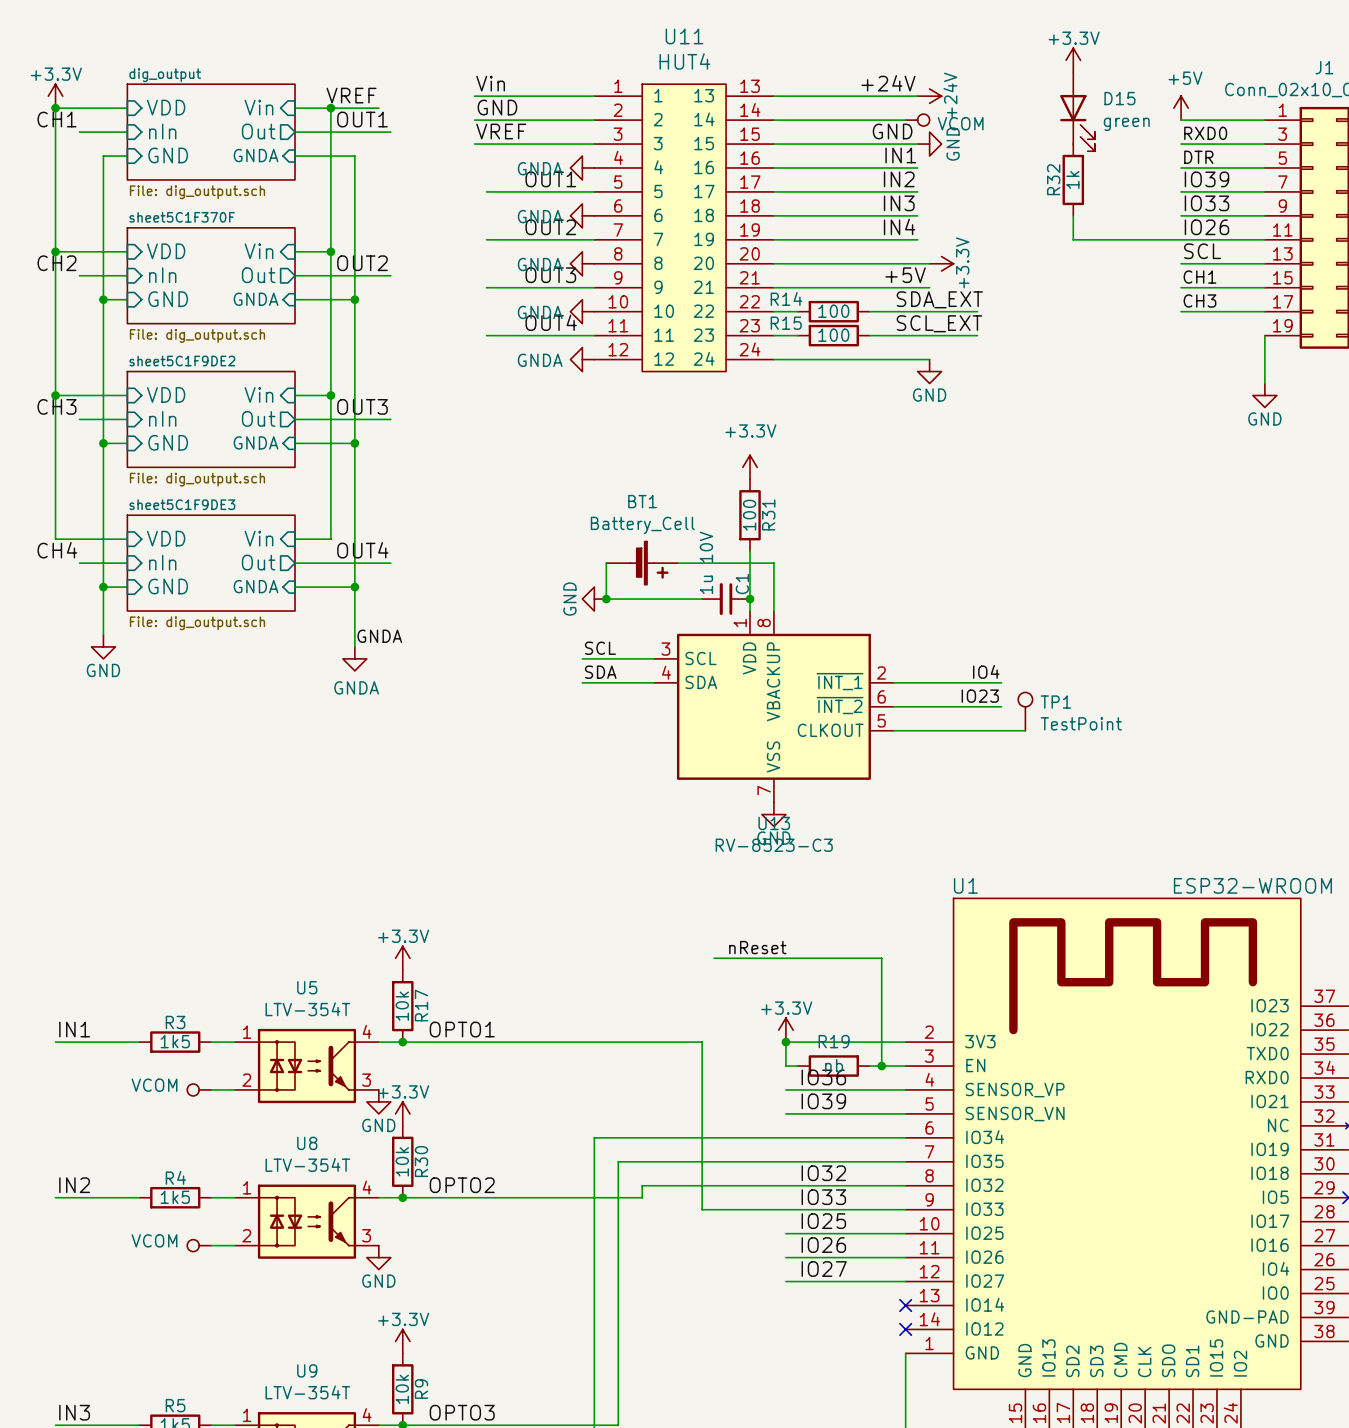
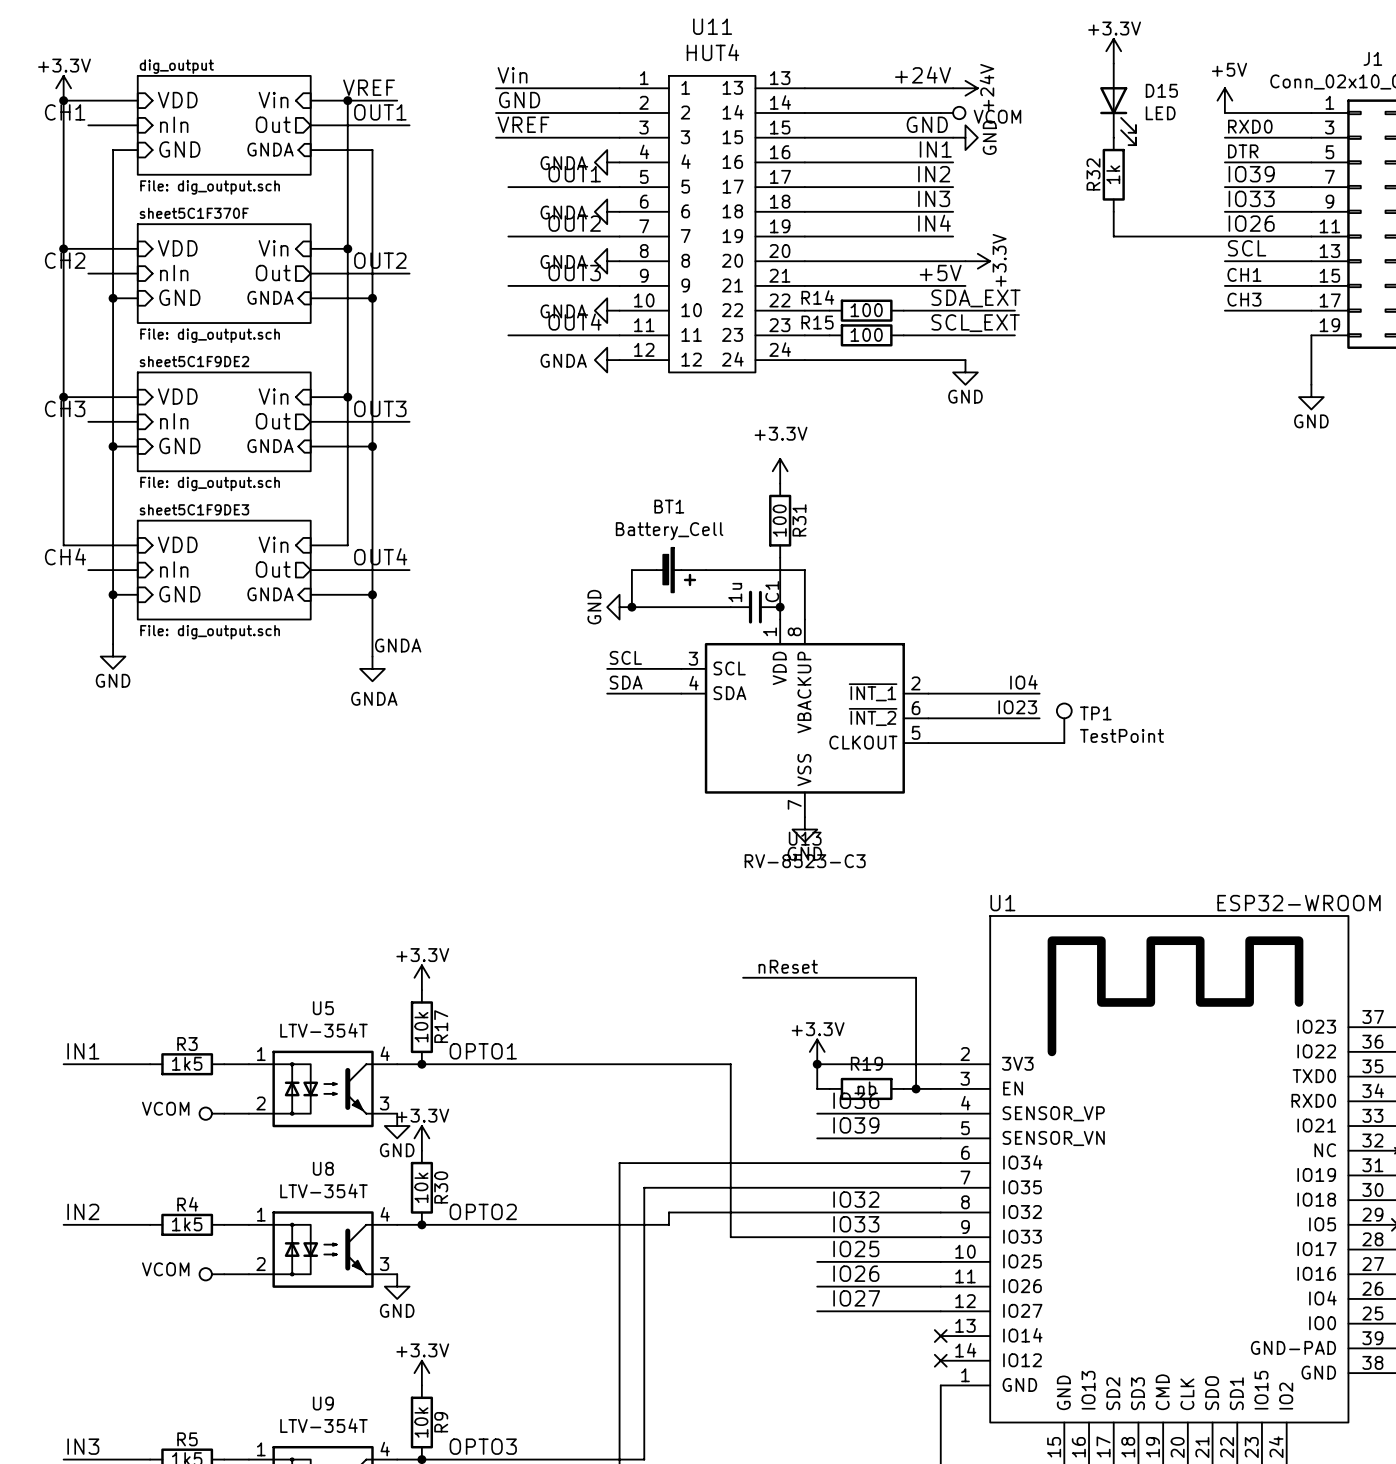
D15 value: green (1126, 124) -> LED (1160, 113)
C1 value: 1u 10V (706, 562) -> 1u (735, 592)

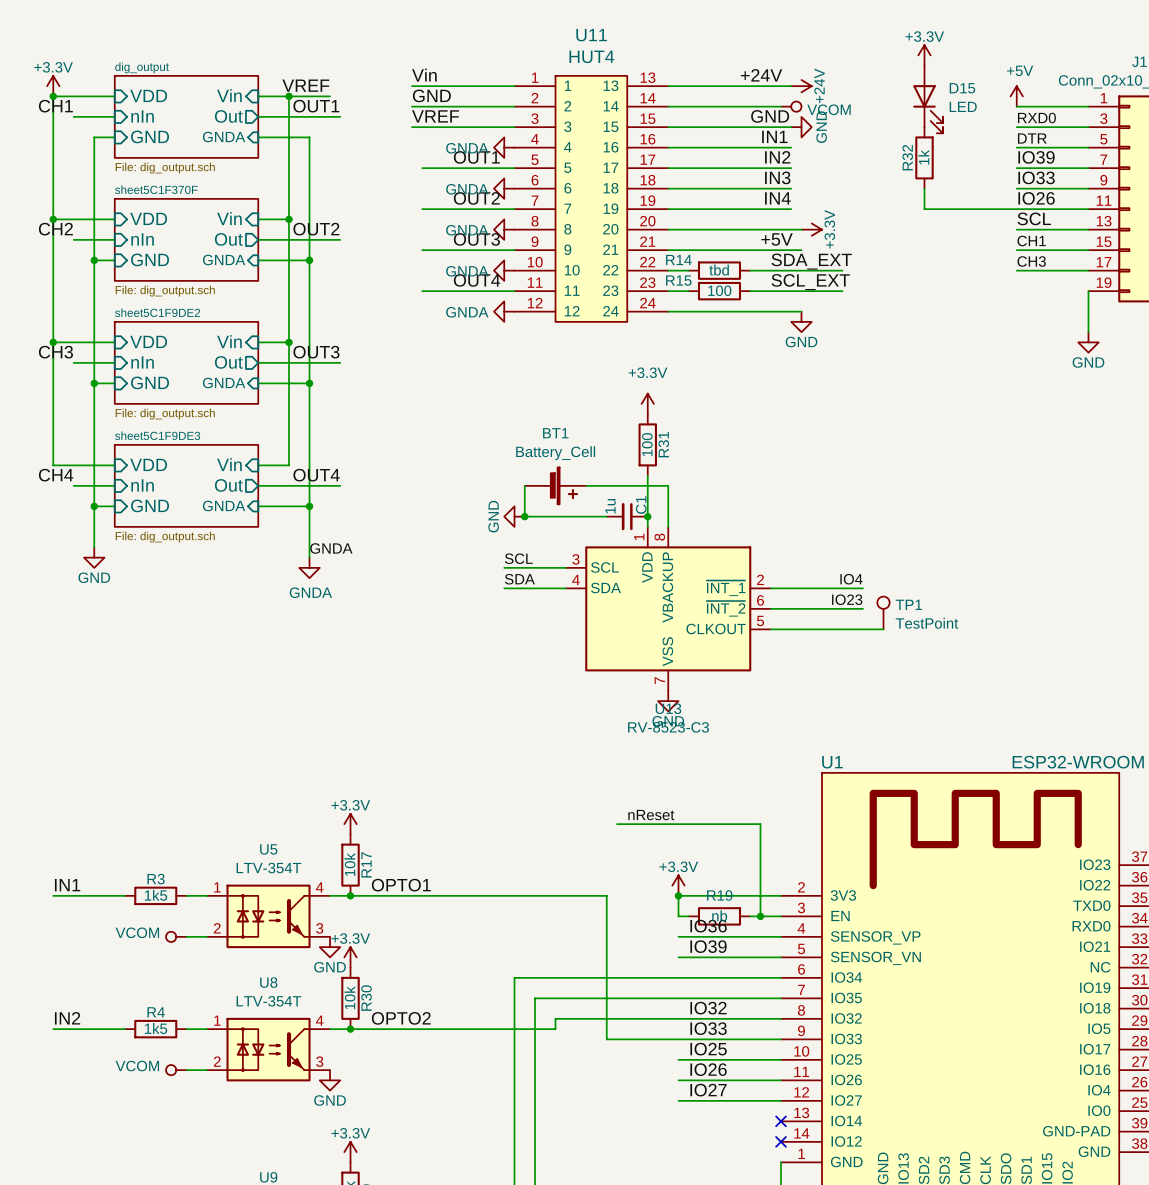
R14 value: 100 (866, 310) -> tbd (719, 270)

